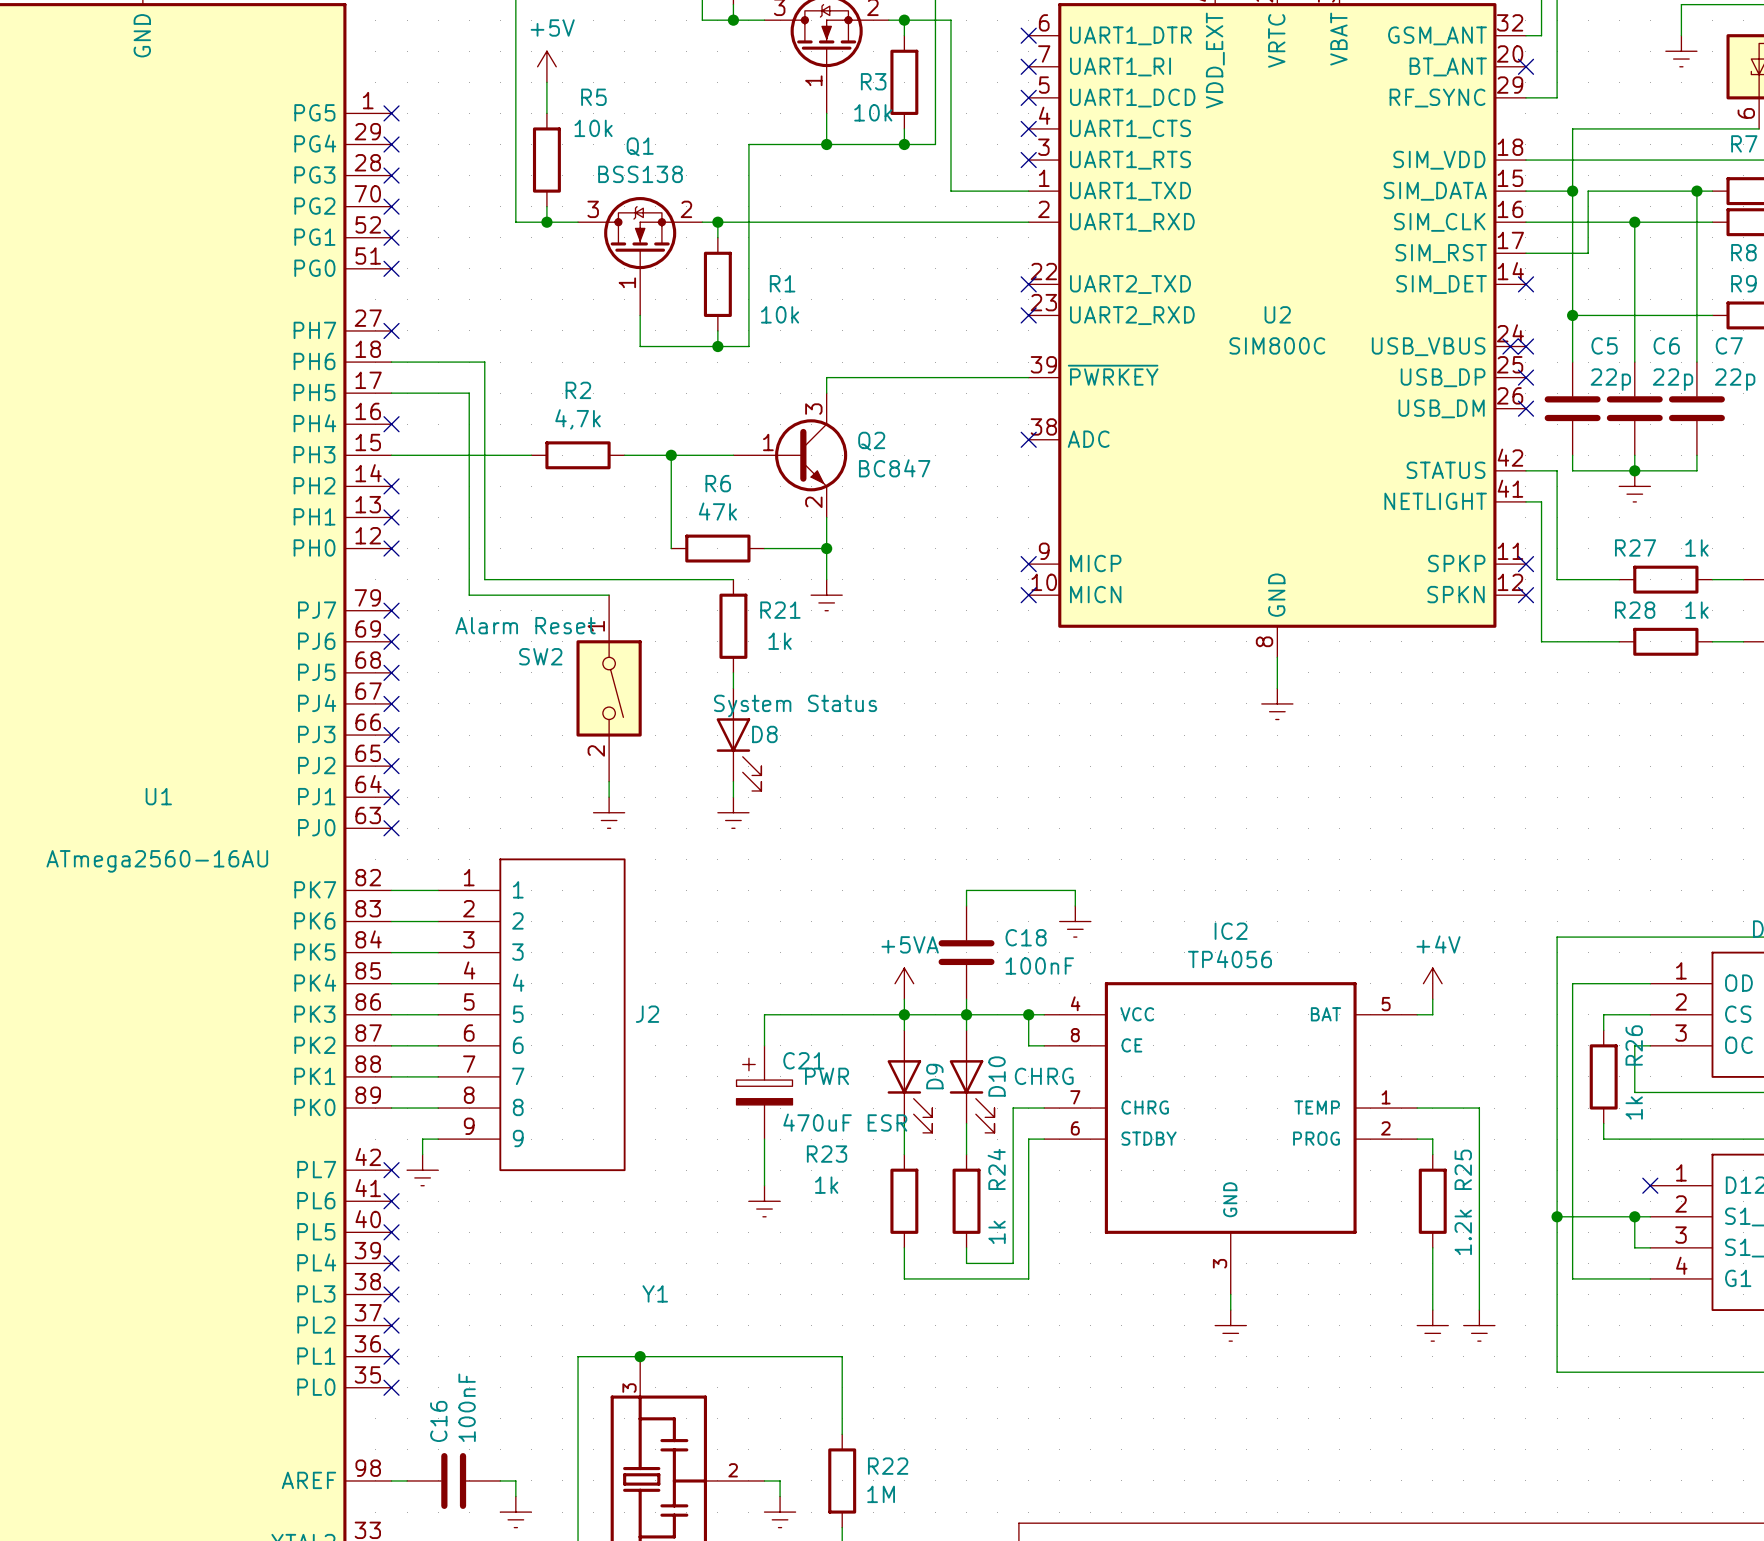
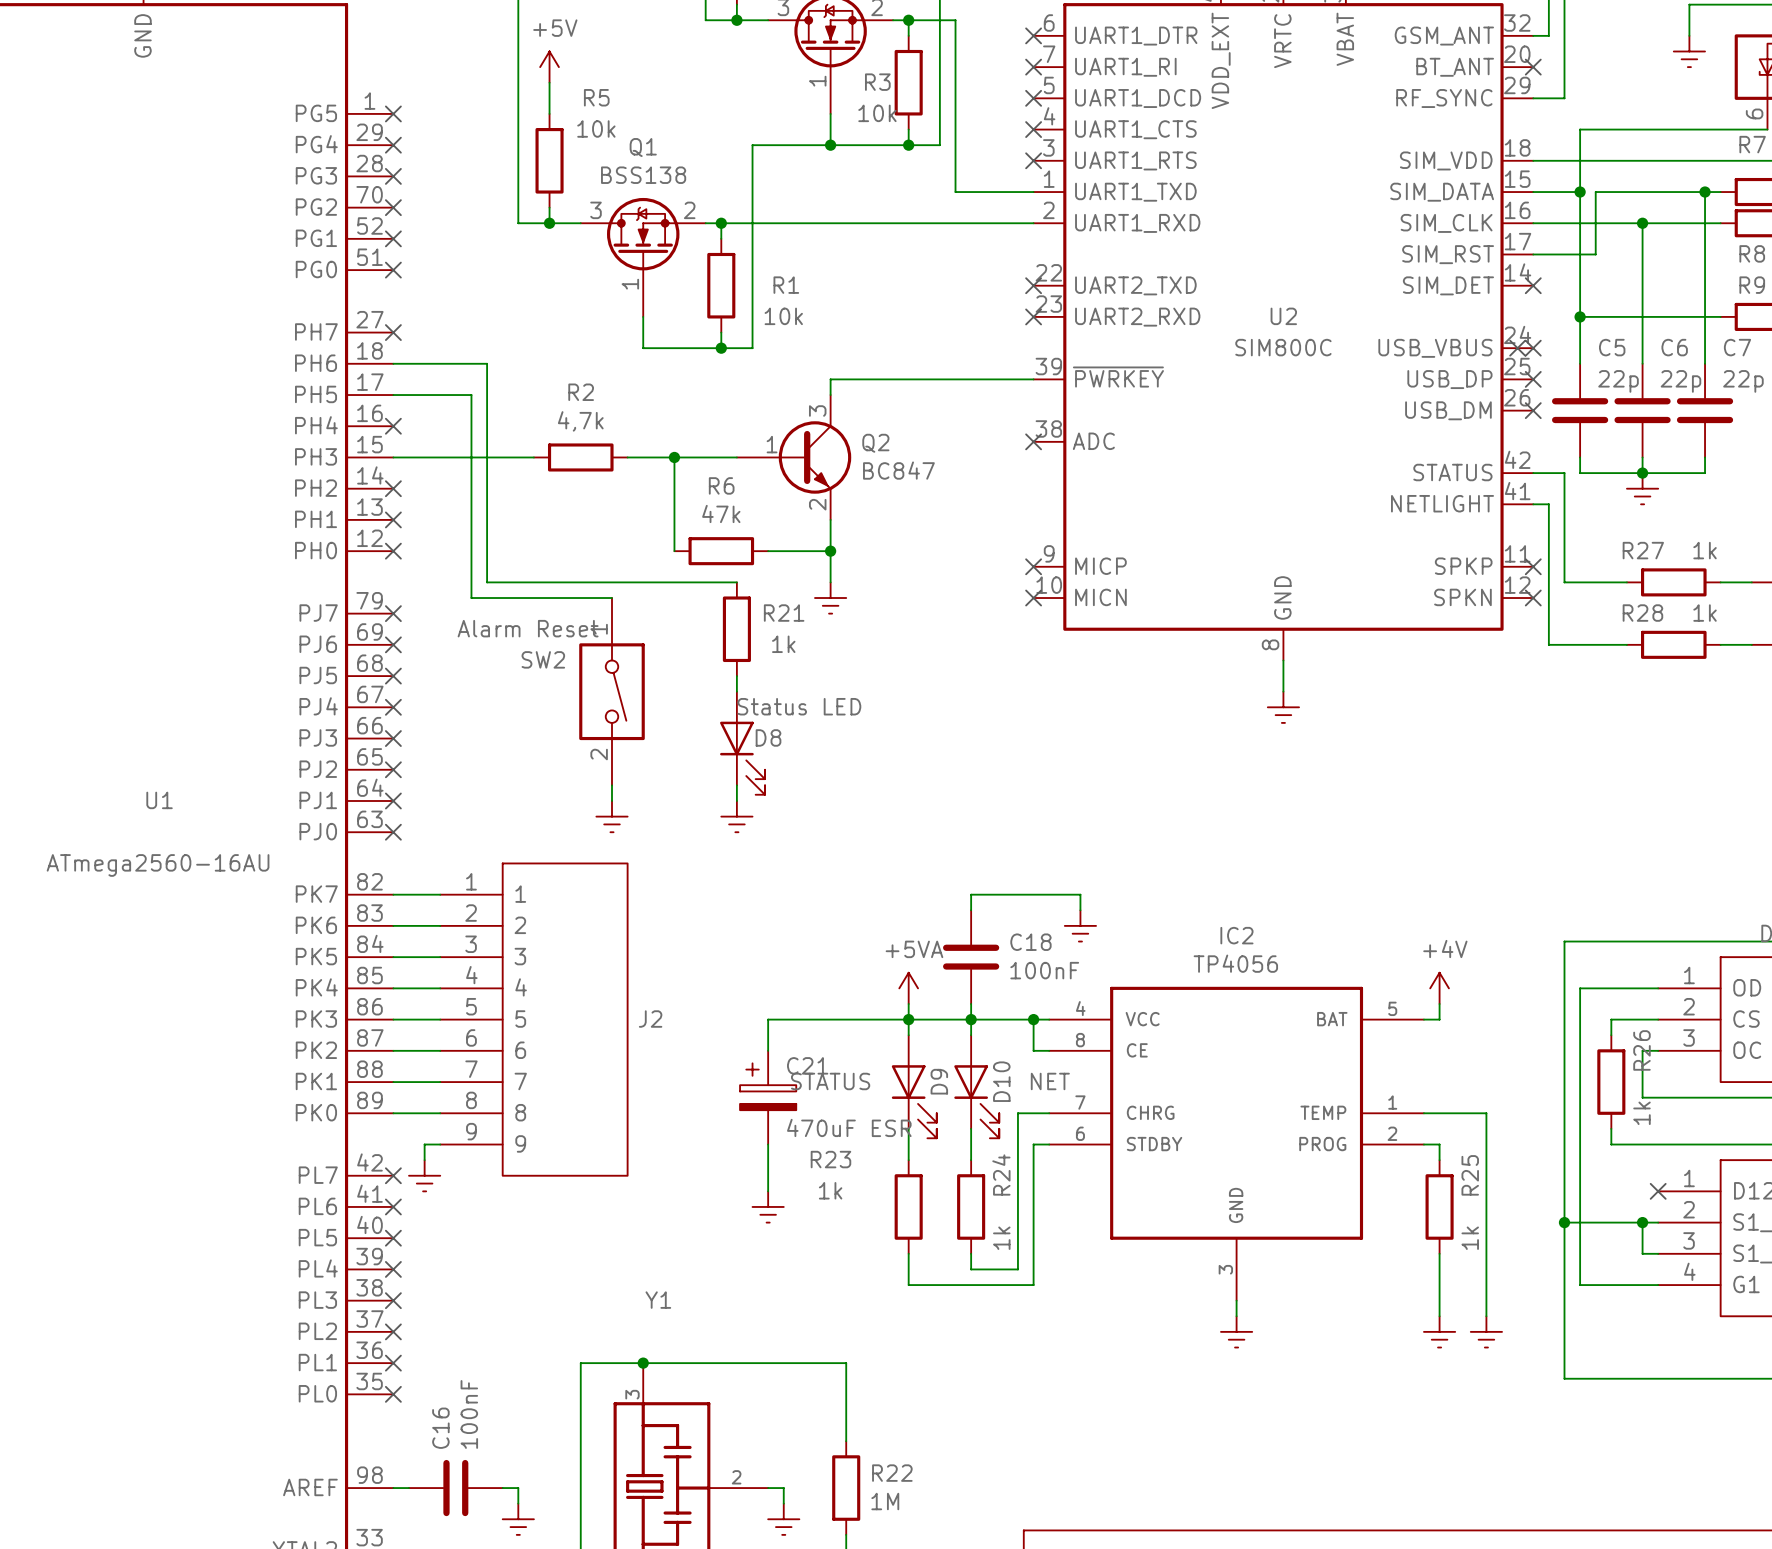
D8 value: System Status (795, 705) -> Status LED (799, 706)
D9 value: PWR (827, 1076) -> STATUS (830, 1081)
D10 value: CHRG (1044, 1076) -> NET (1050, 1081)
R25 value: 1.2k (1463, 1232) -> 1k (1470, 1238)

